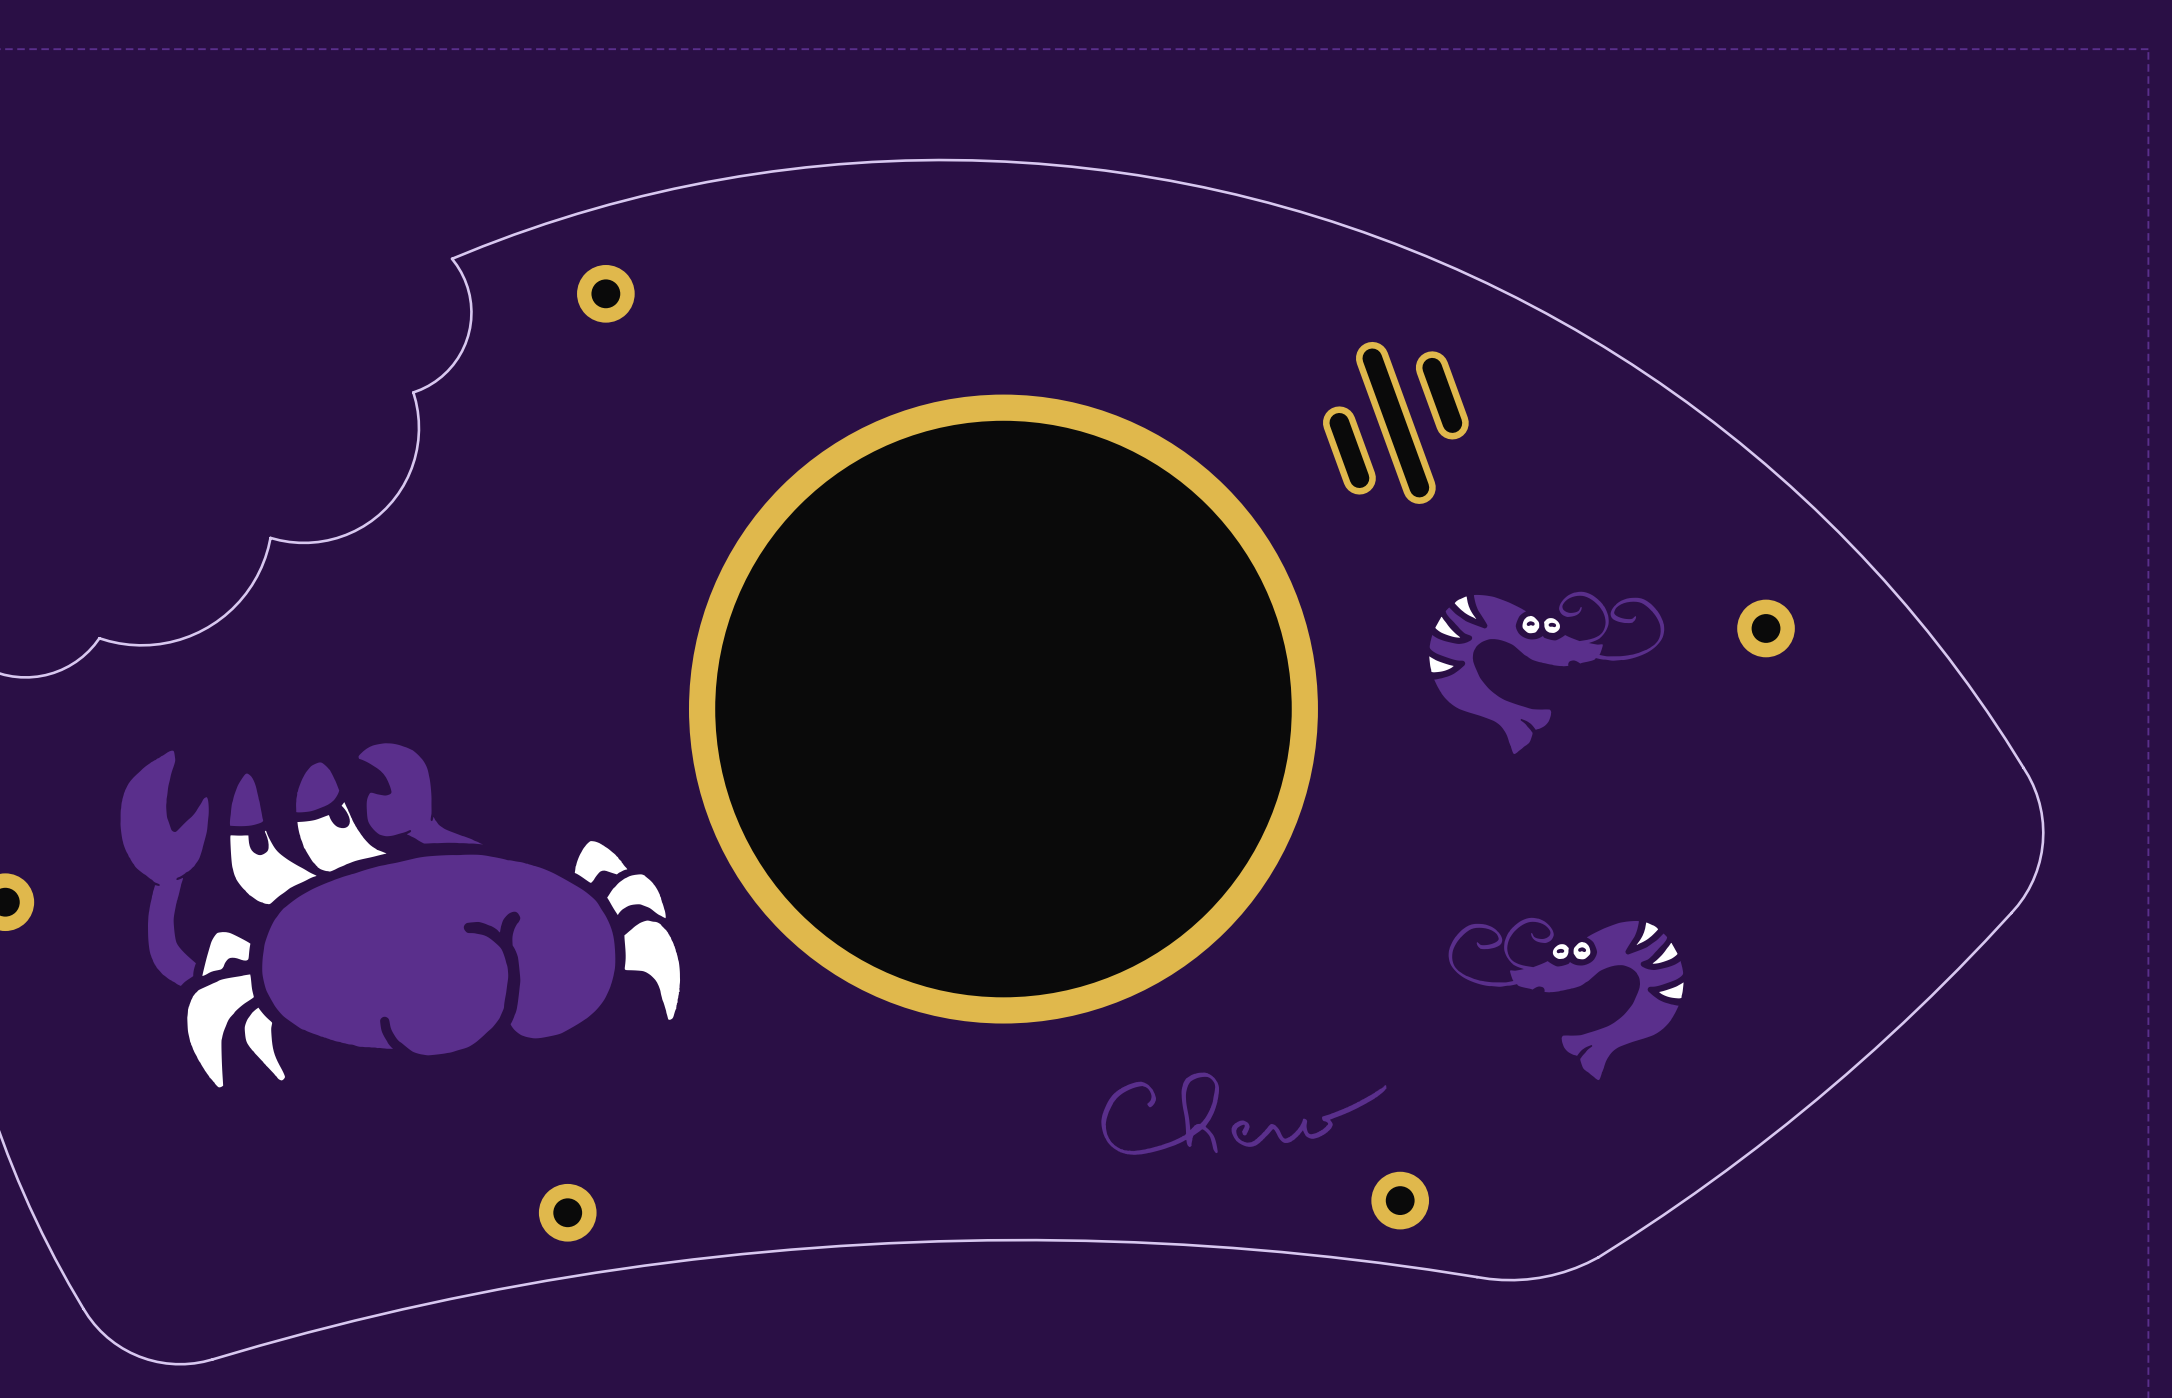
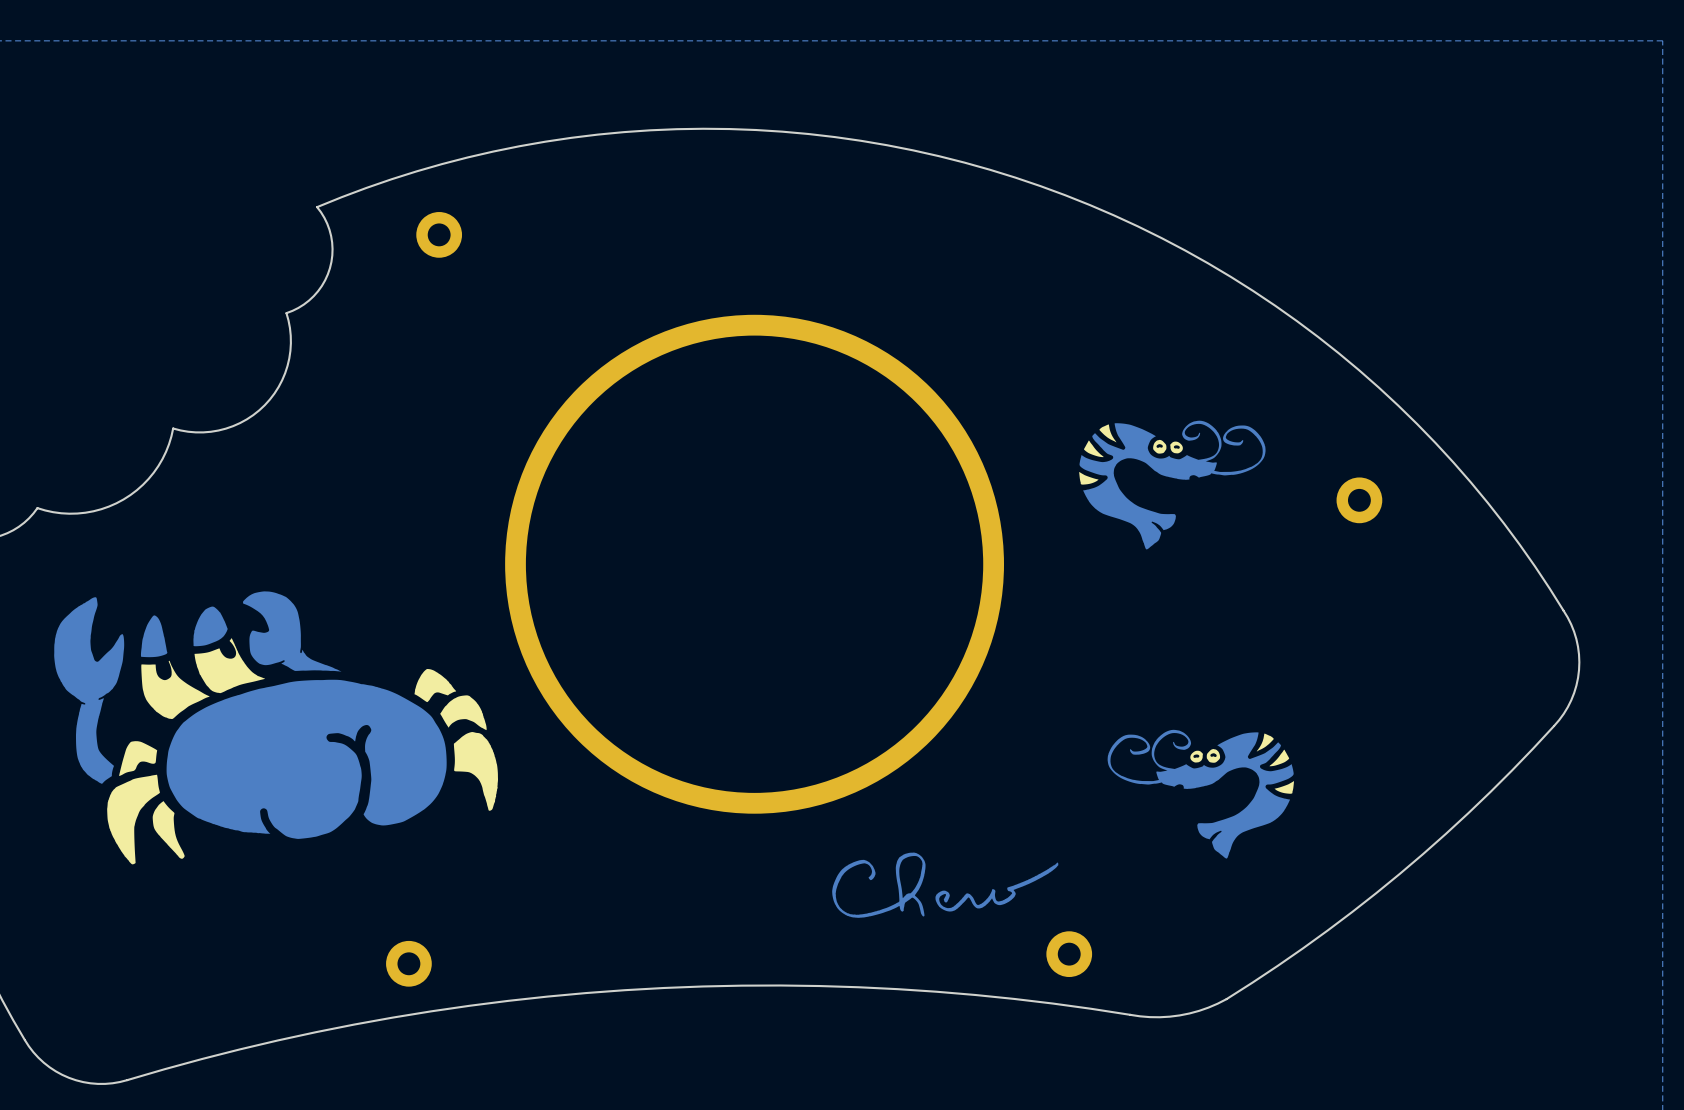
part: (1442, 395) -> none
part: (1395, 422) -> none
part: (1349, 450) -> none
drawing position: (1546, 672) -> (1172, 485)

